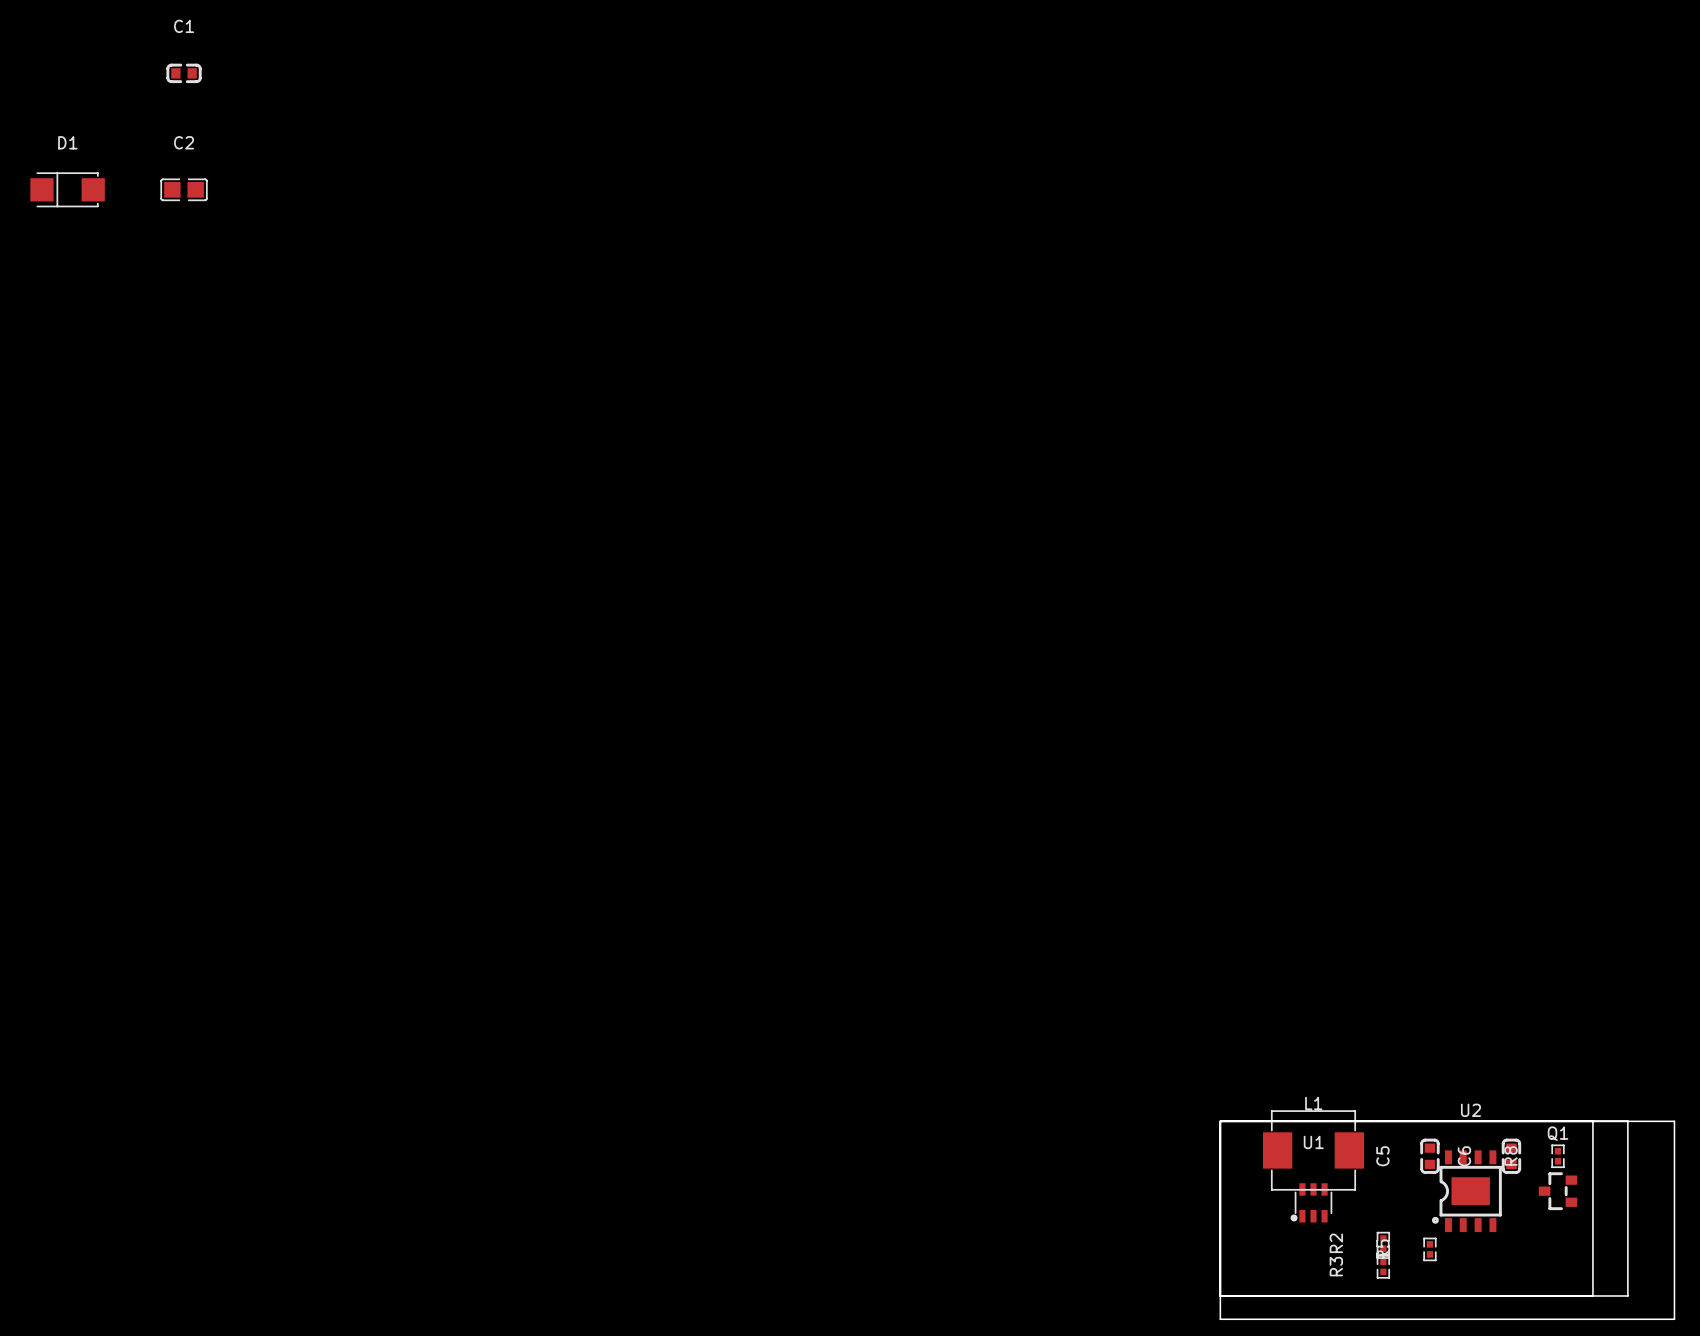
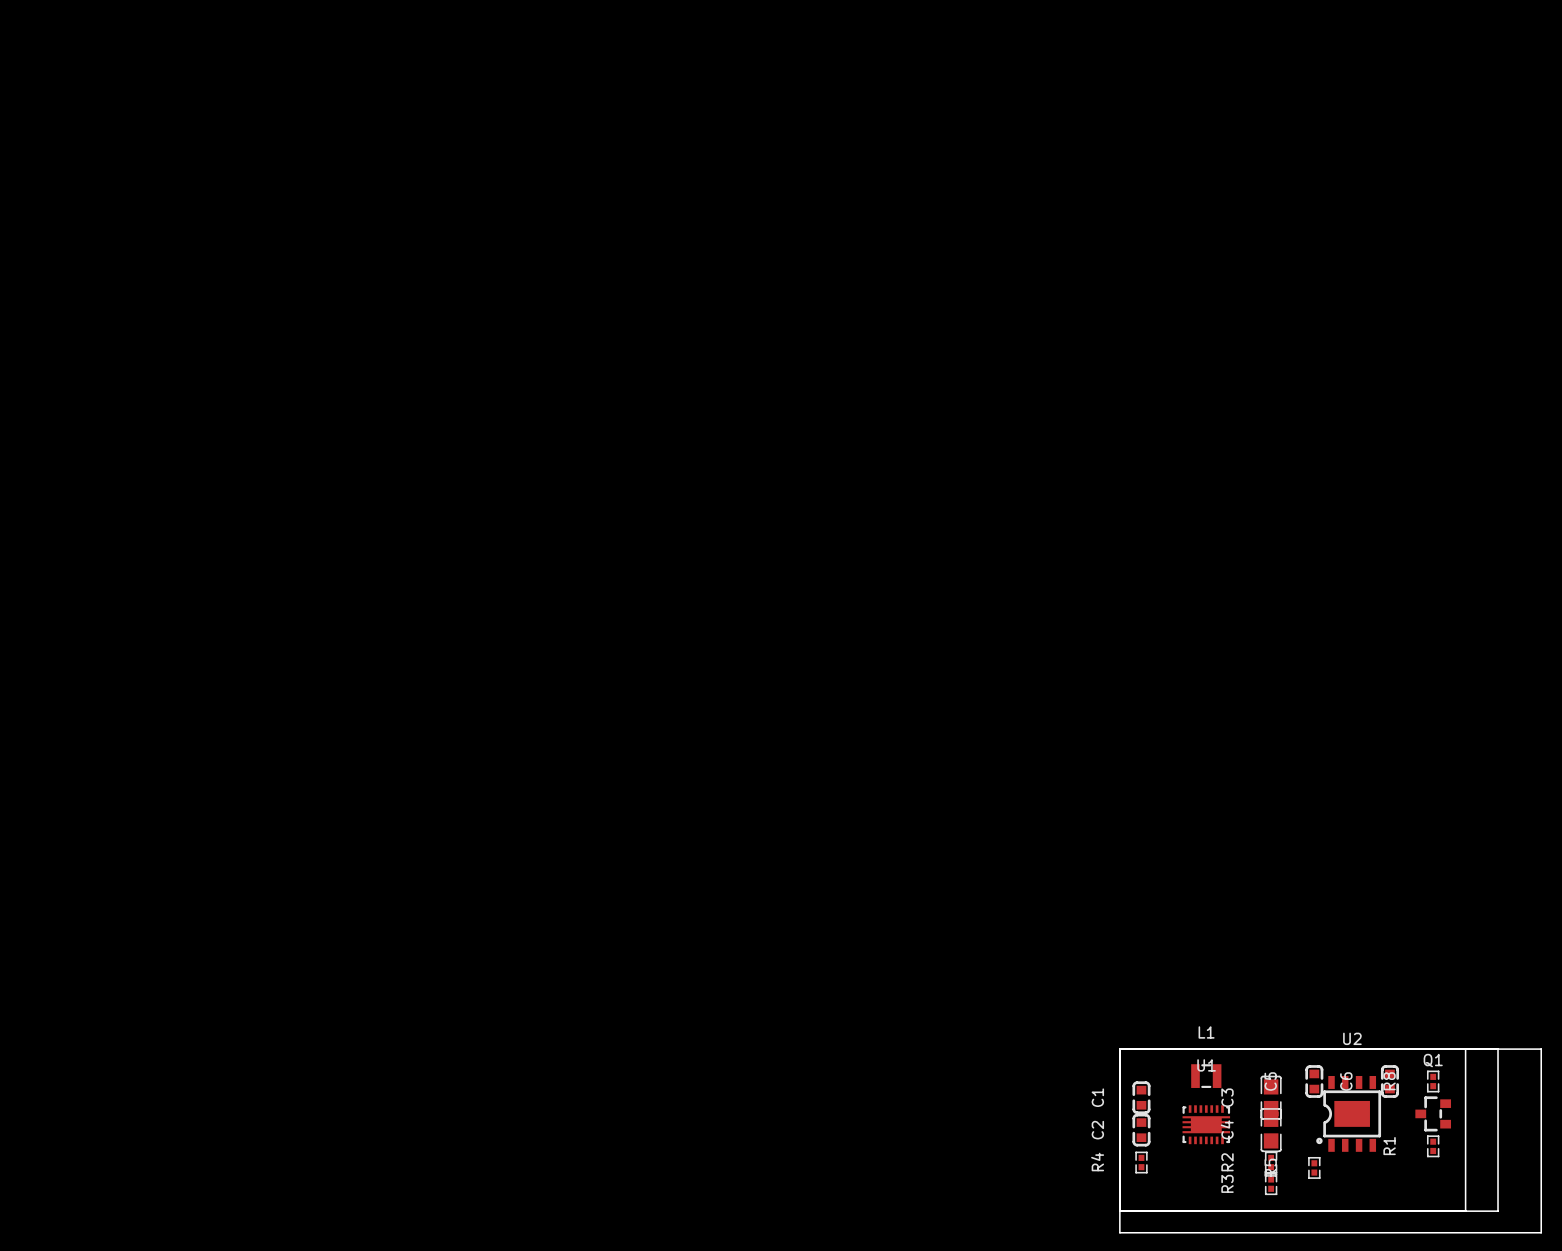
C1 name position: C1 (184, 26) -> C1 (1097, 1097)
C1 rotation: 0° (184, 73) -> 90° clockwise (1141, 1097)
C1 position: (184, 73) -> (1141, 1097)
C2 name position: C2 (184, 142) -> C2 (1097, 1130)
C2 footprint: [160, 178, 208, 202] -> [1132, 1113, 1151, 1147]
D1: (67, 189) -> none
L1 footprint: [1262, 1110, 1365, 1191] -> [1191, 1064, 1222, 1088]
C3: none -> (1271, 1097)
U1 footprint: [1290, 1183, 1333, 1223] -> [1182, 1105, 1231, 1148]
C4: none -> (1271, 1130)
R1: none -> (1433, 1146)
R4: none -> (1141, 1162)

